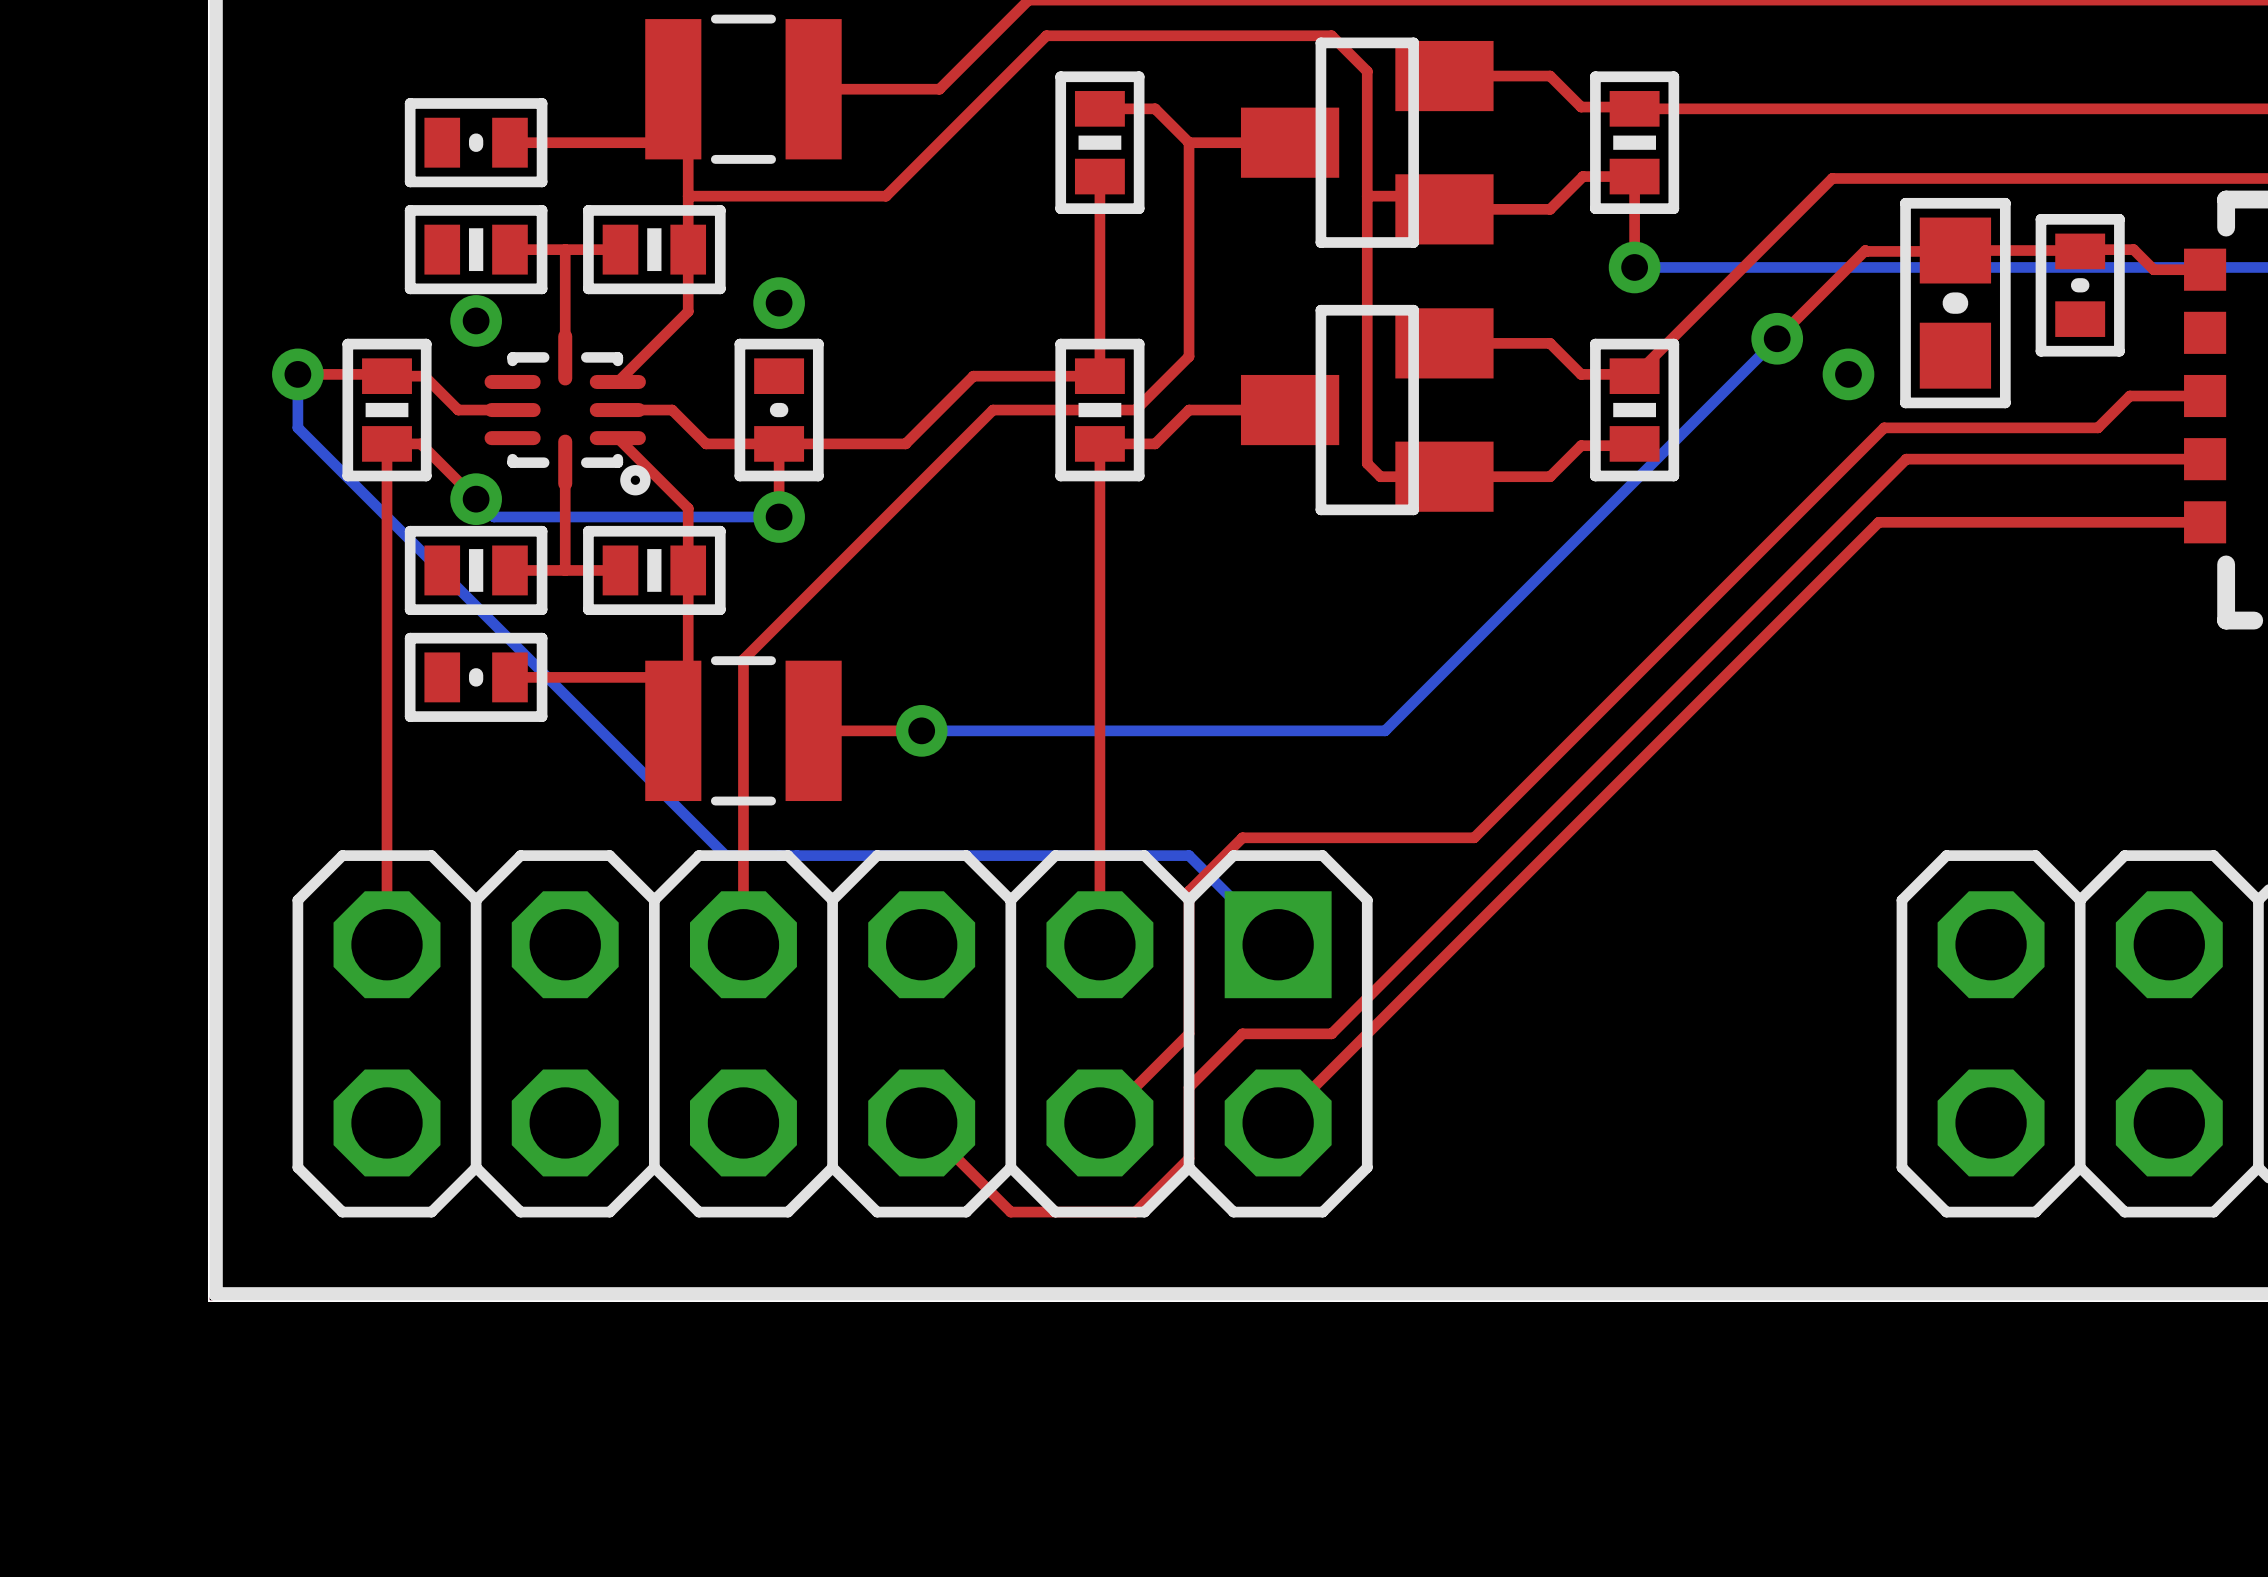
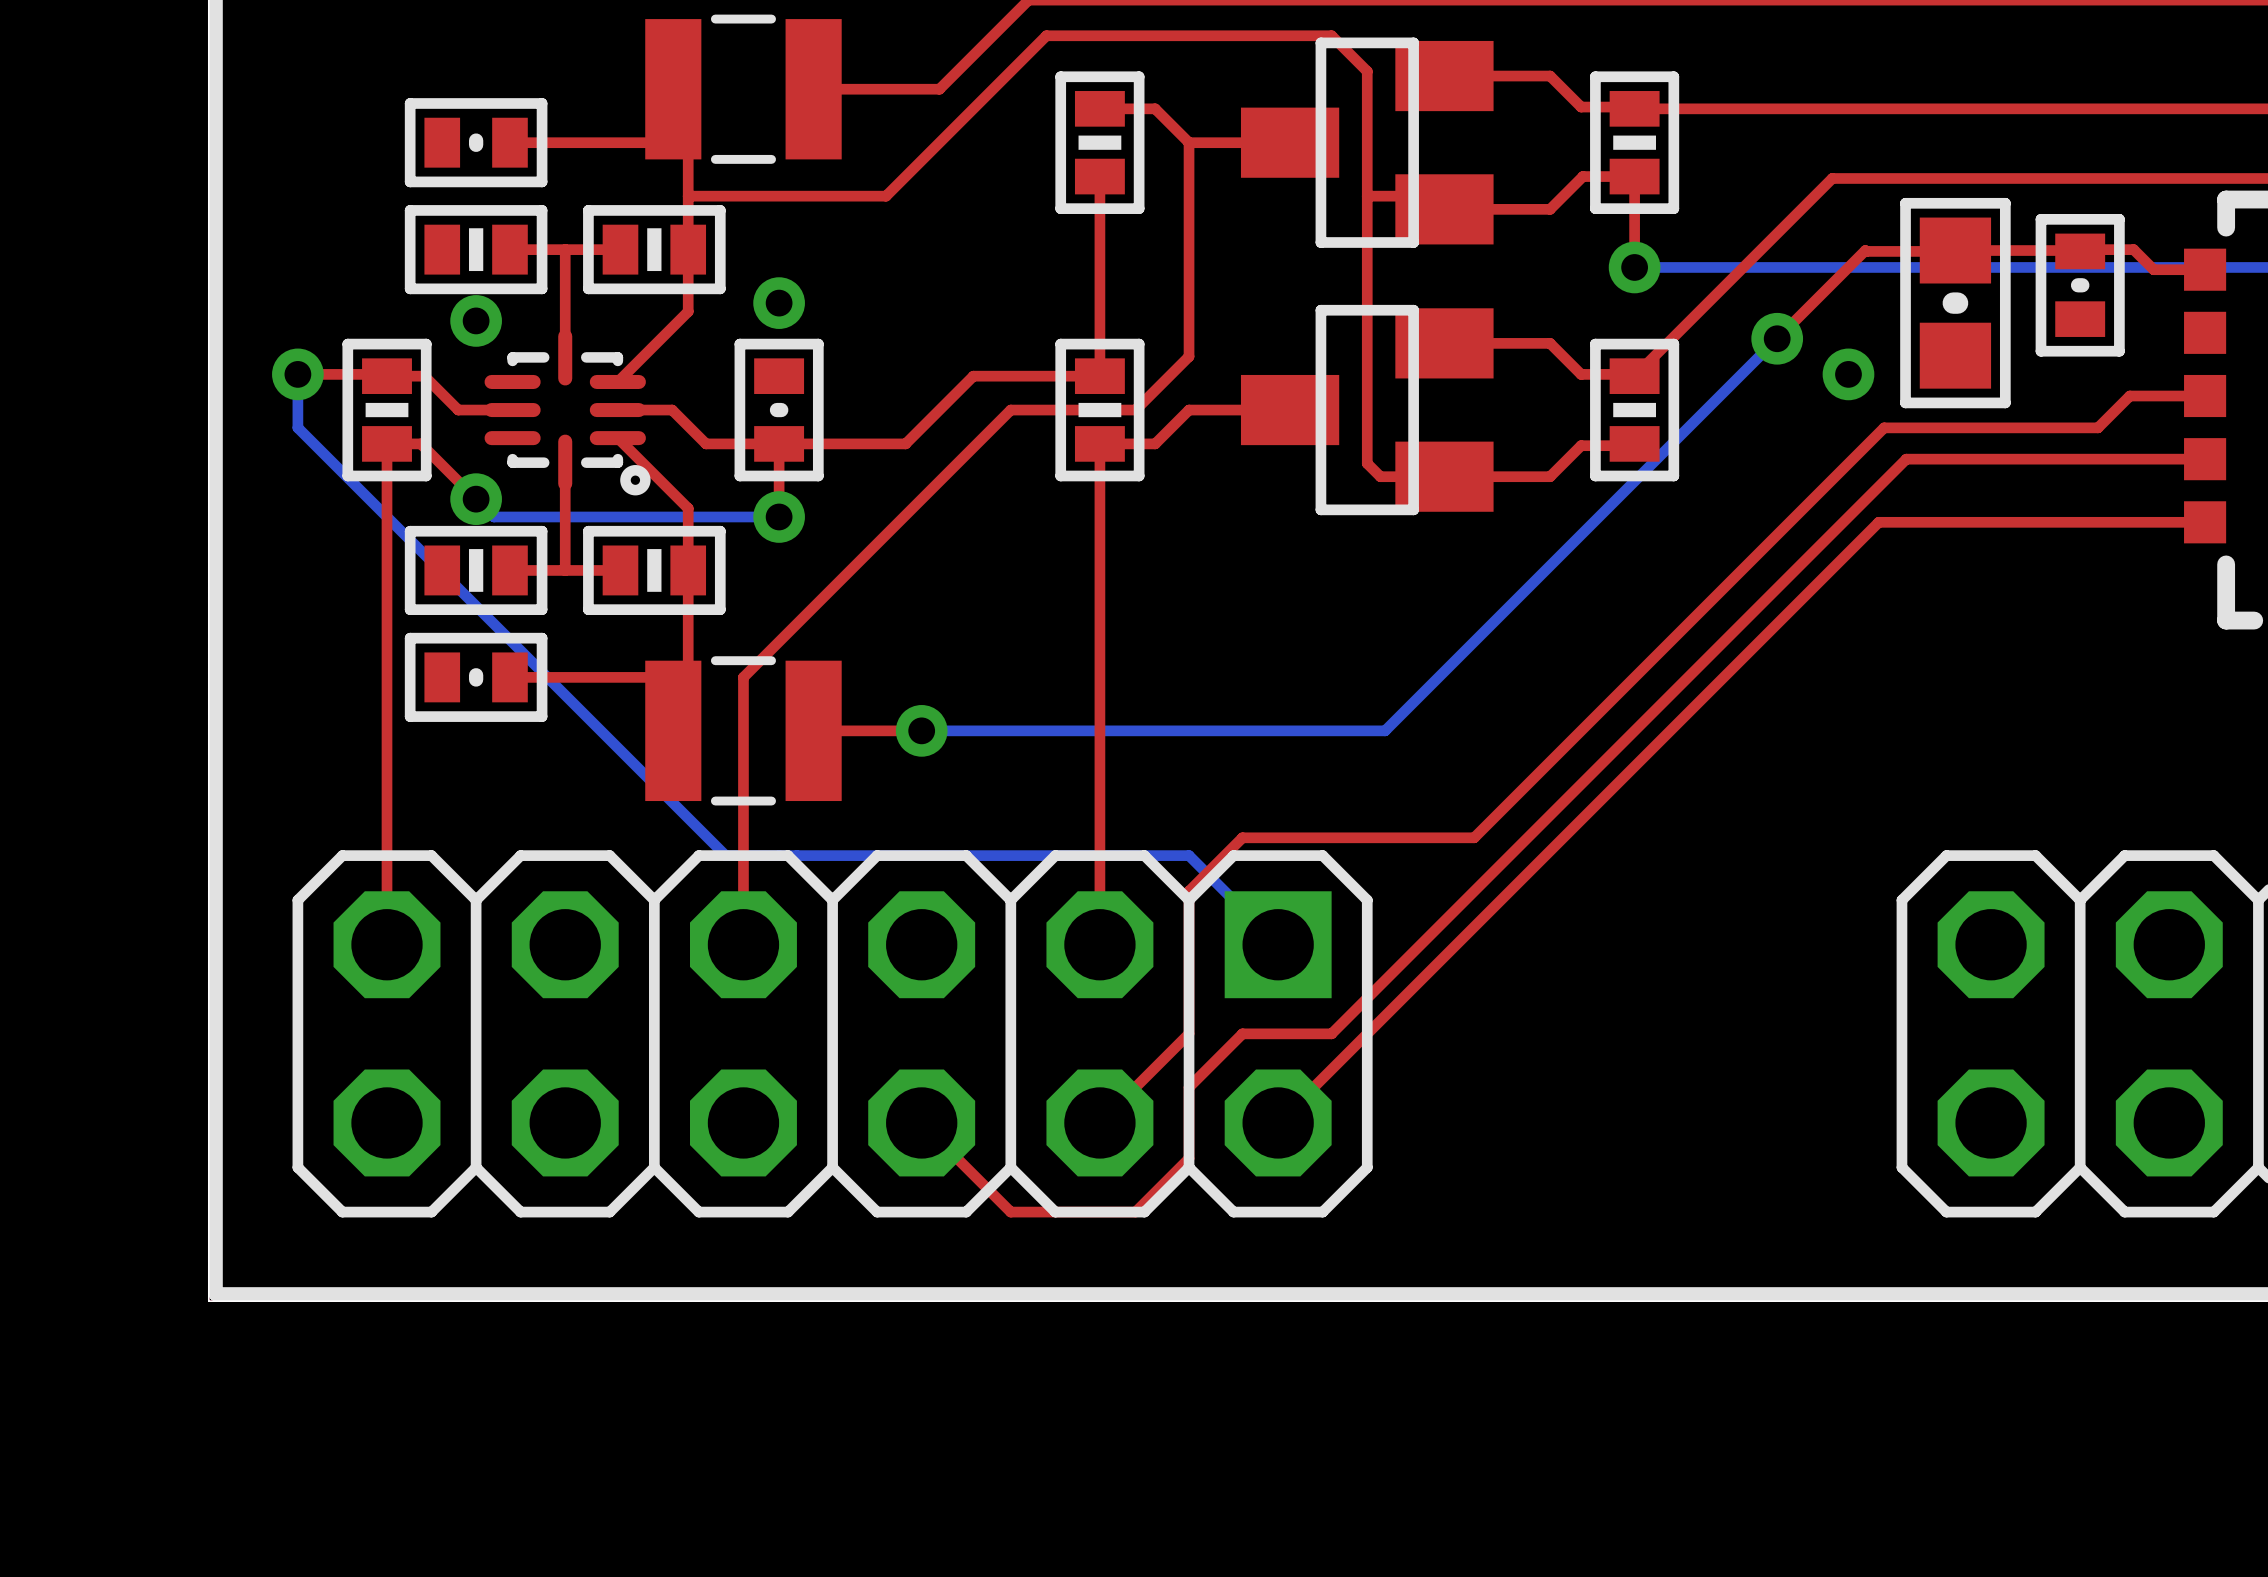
top track: (1010, 410) (992, 410) (743, 659) (743, 677) -> (1010, 410) (743, 677)

